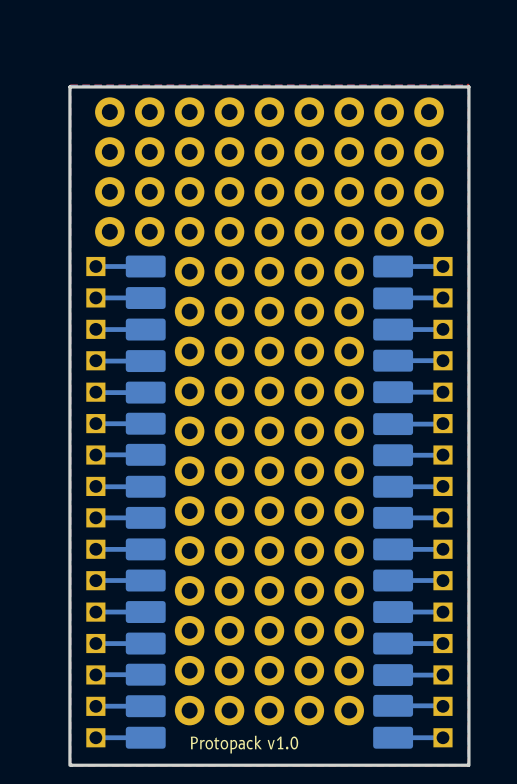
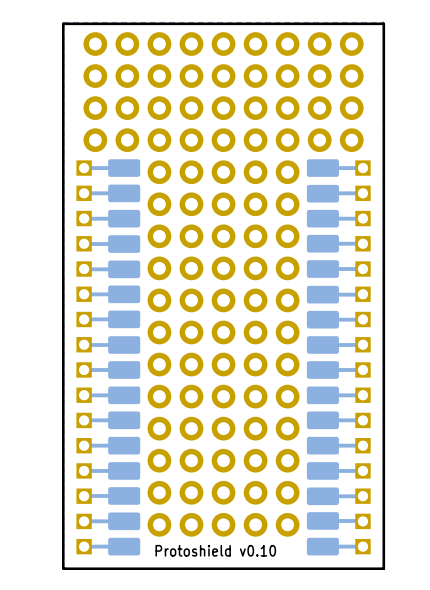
text: Protopack v1.0 (244, 744) -> Protoshield v0.10 (215, 550)

